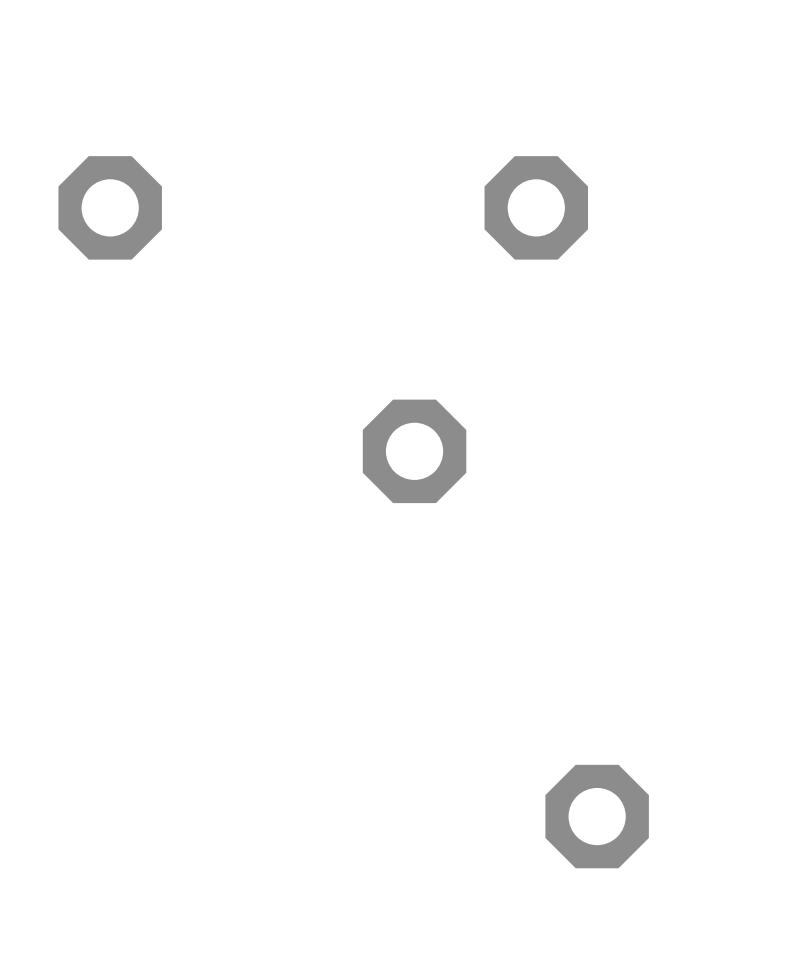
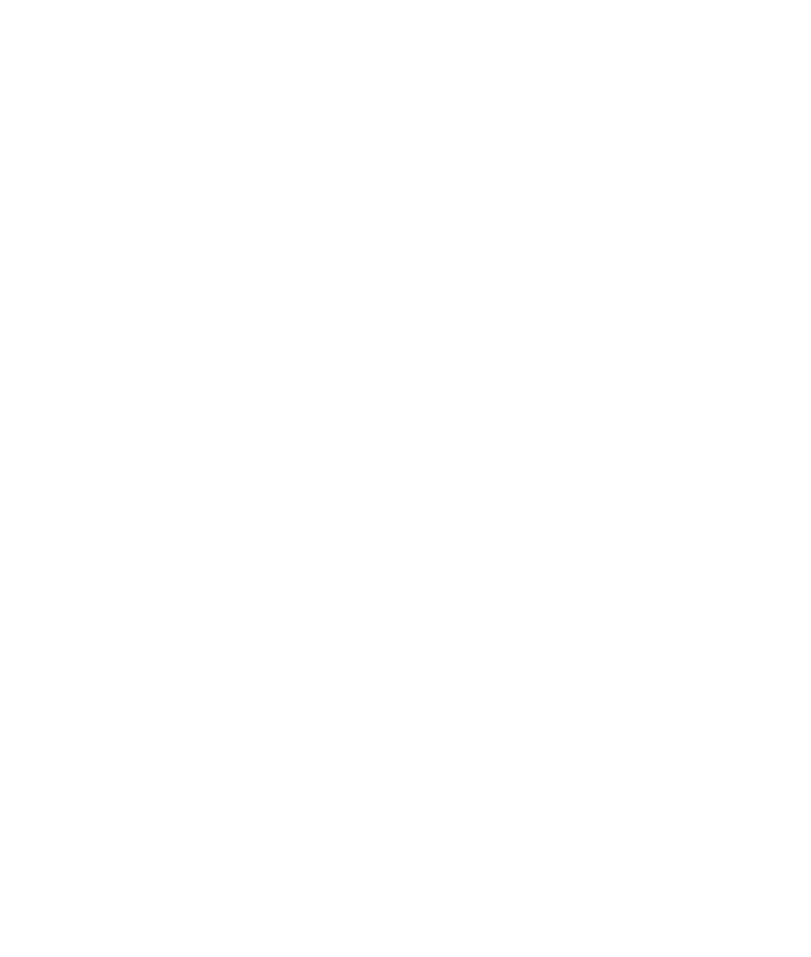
part: (110, 207) -> none
part: (536, 207) -> none
part: (414, 451) -> none
part: (597, 816) -> none

